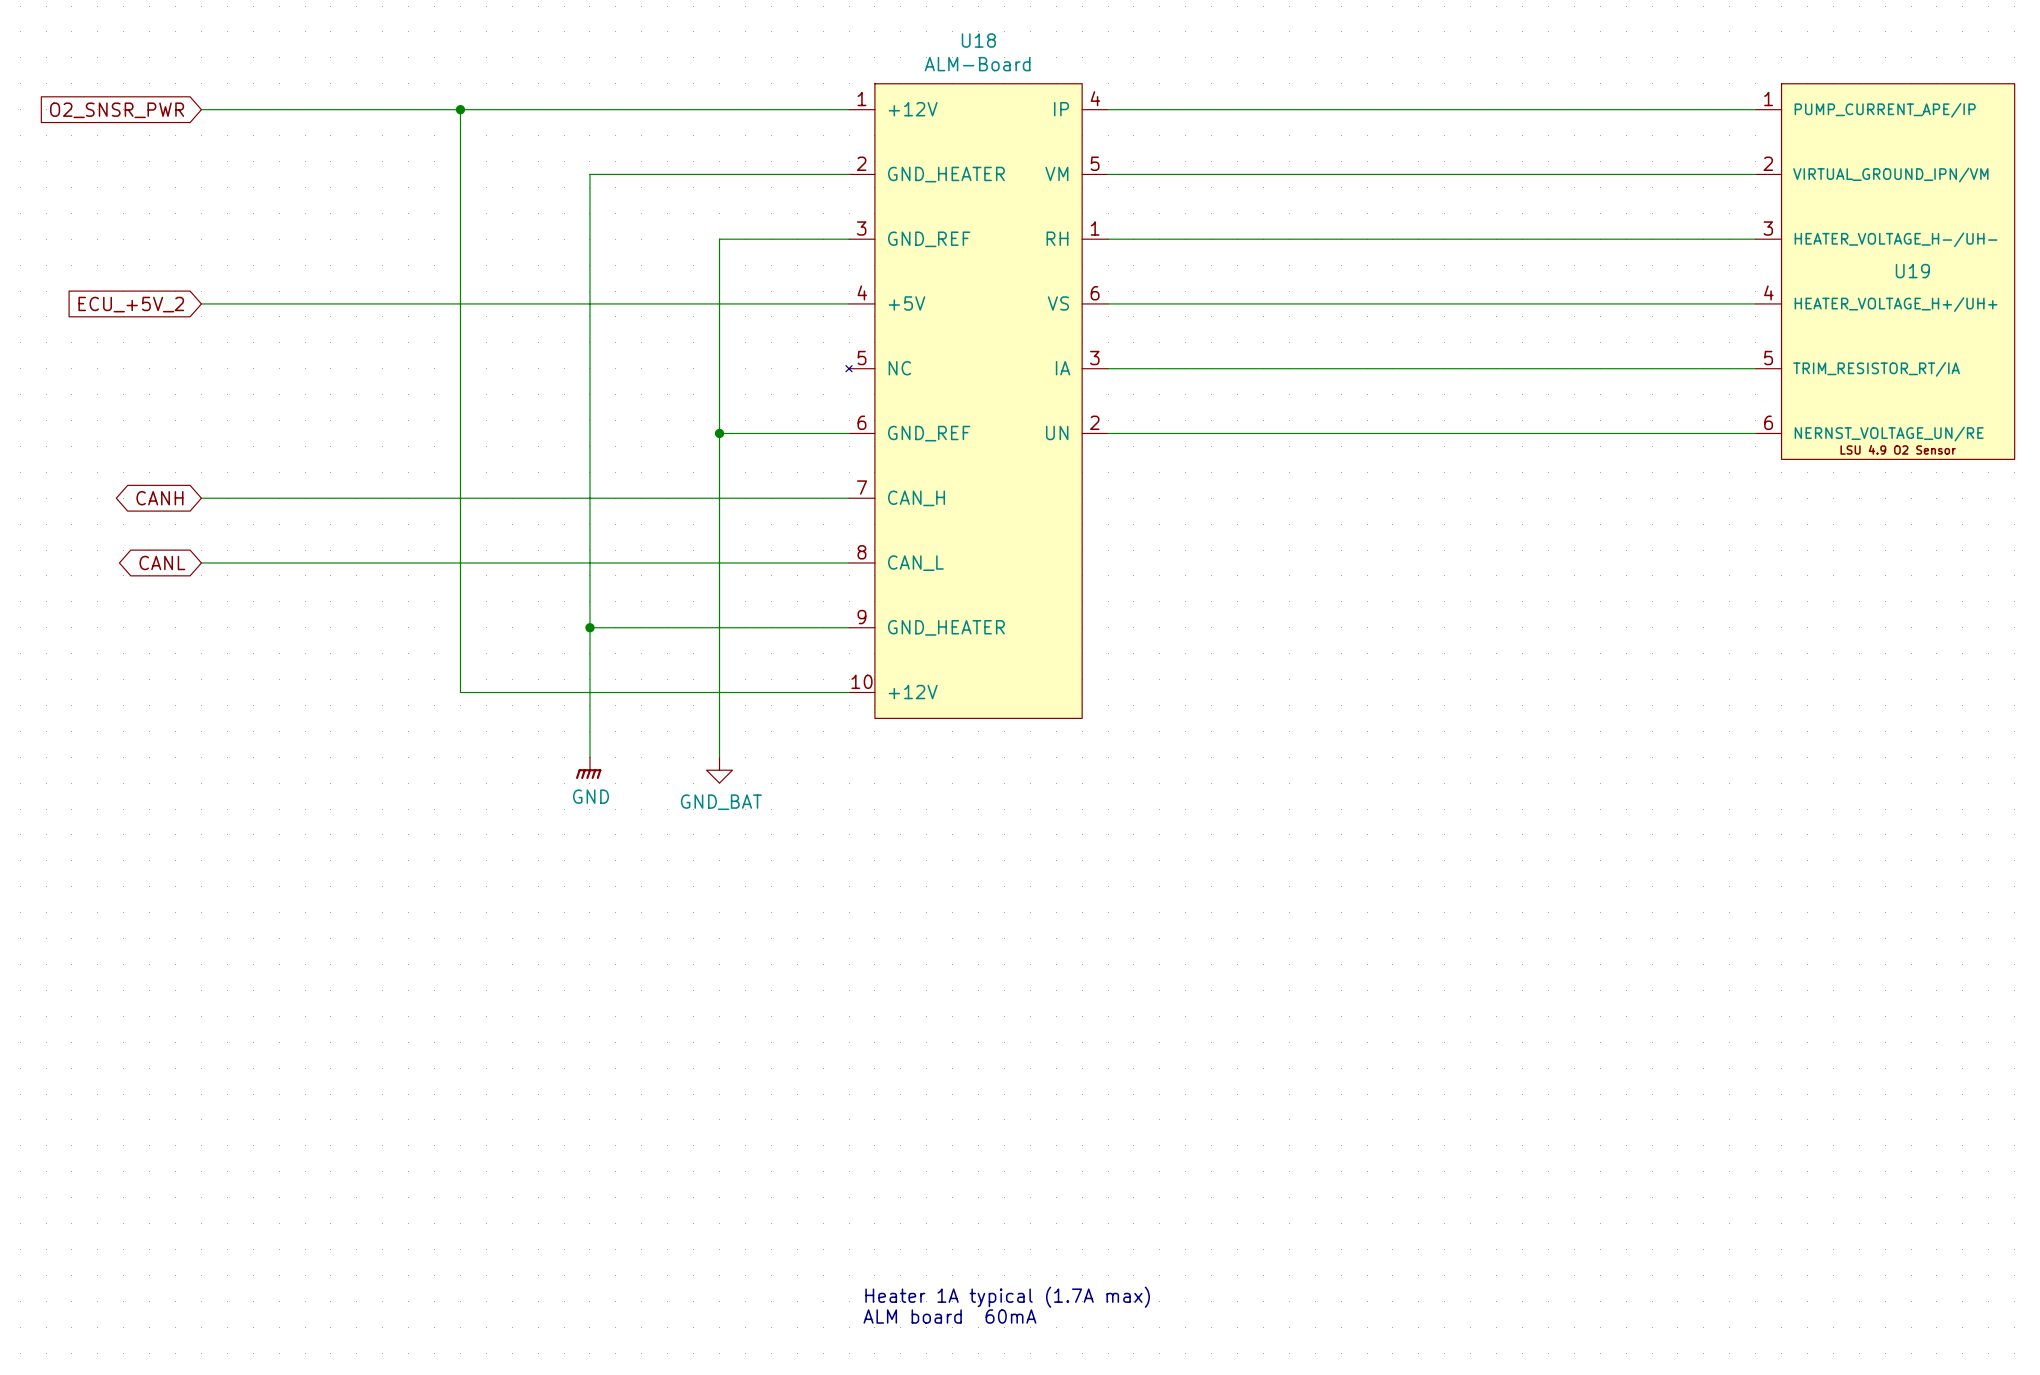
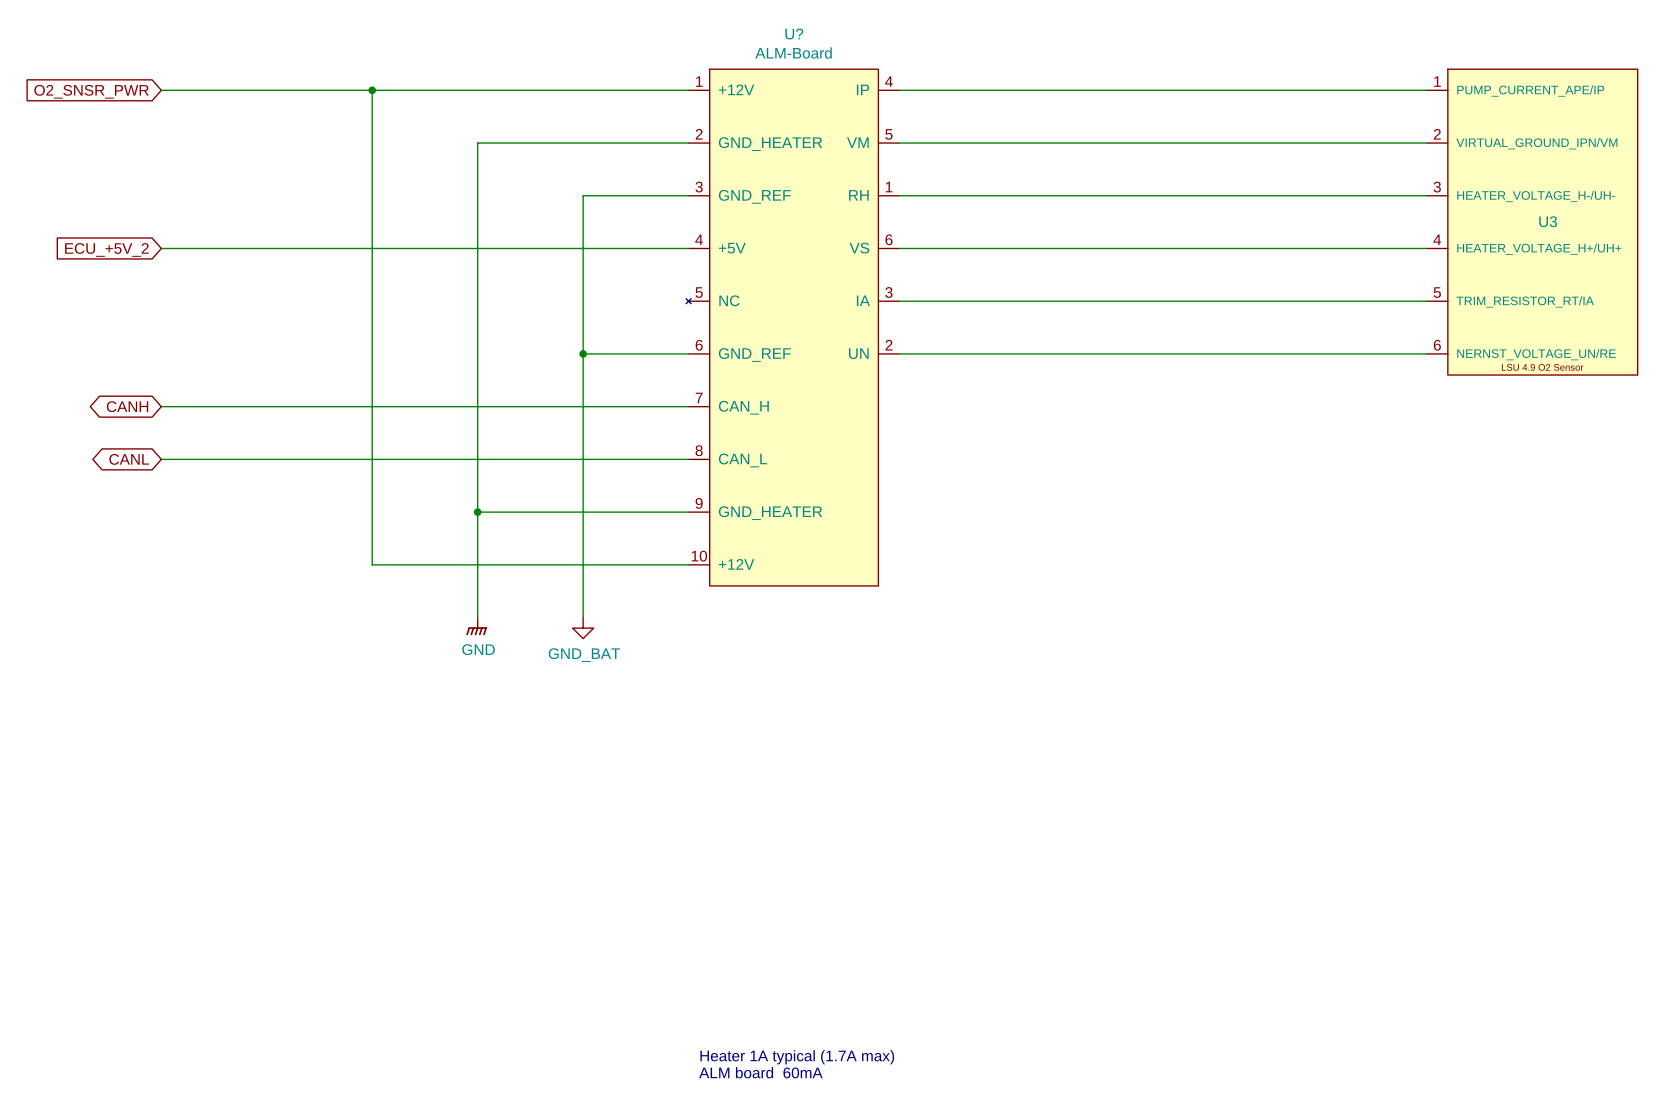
U18 name: U18 (978, 40) -> U? (794, 34)
U19 name: U19 (1912, 271) -> U3 (1548, 221)

